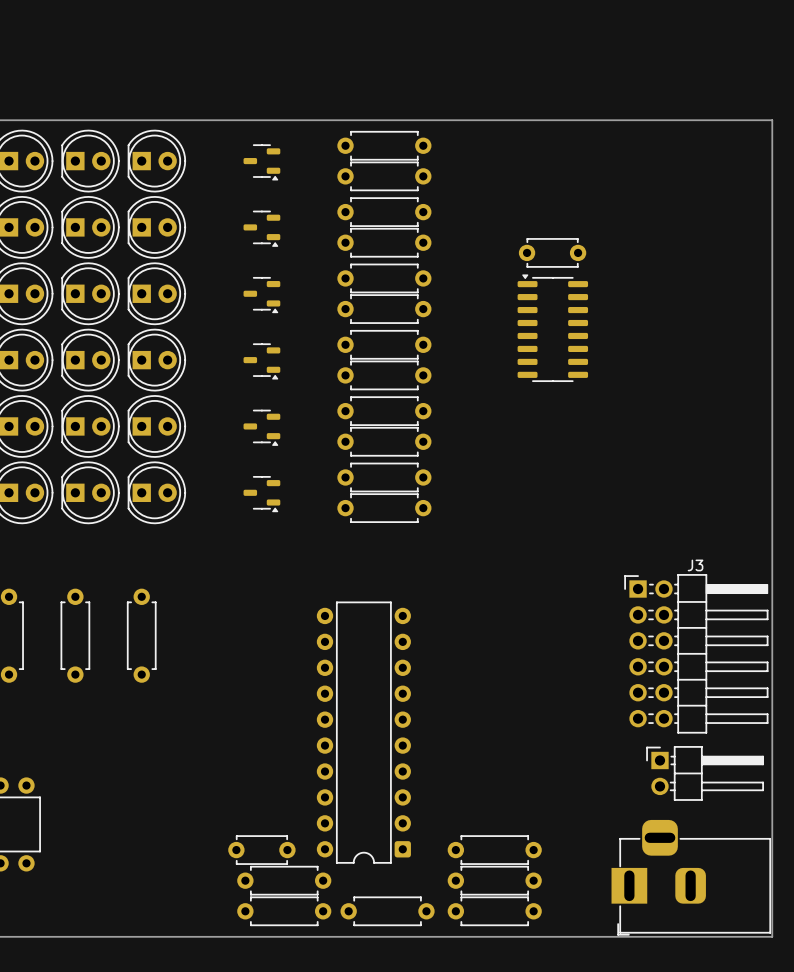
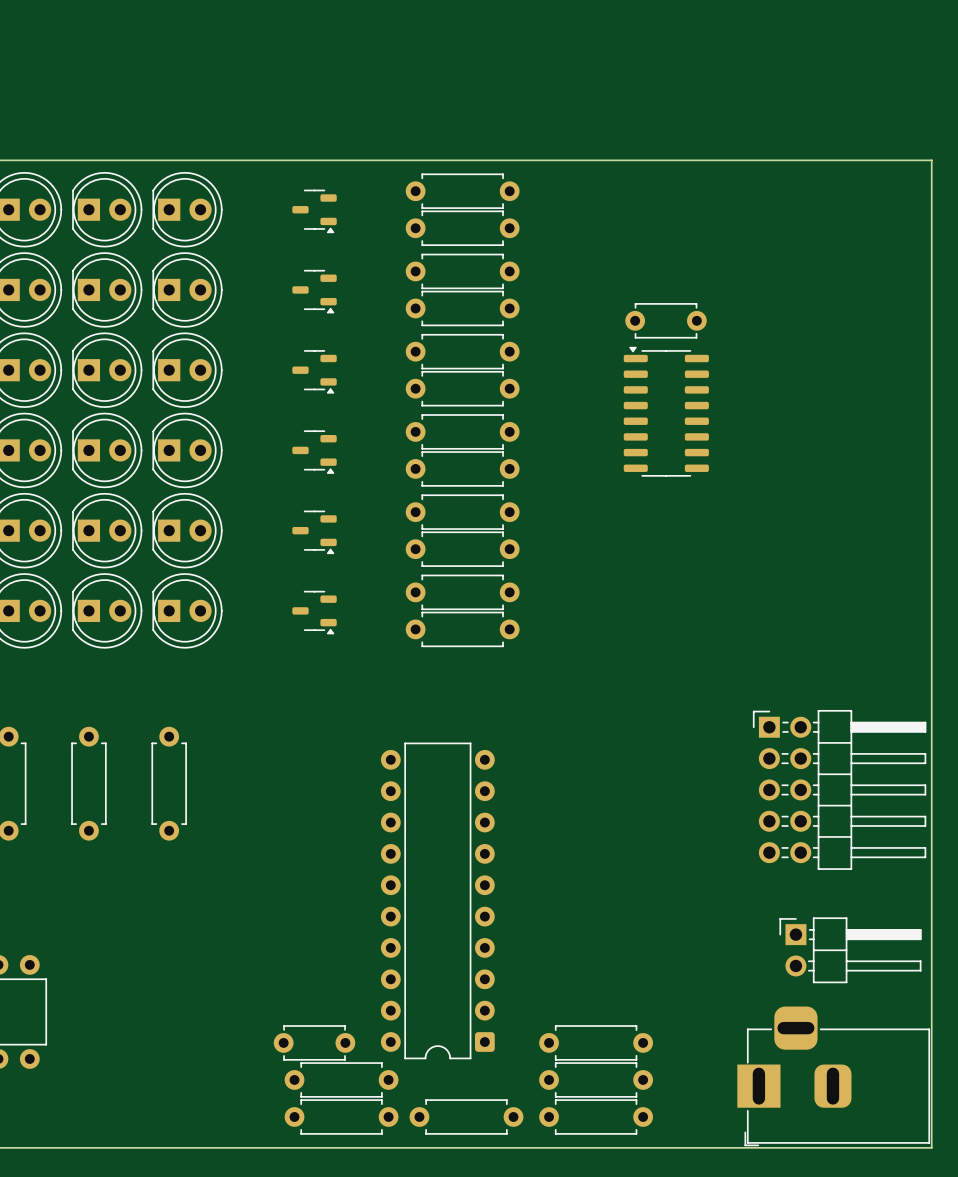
part: none -> (839, 789)
J3: (696, 653) -> none

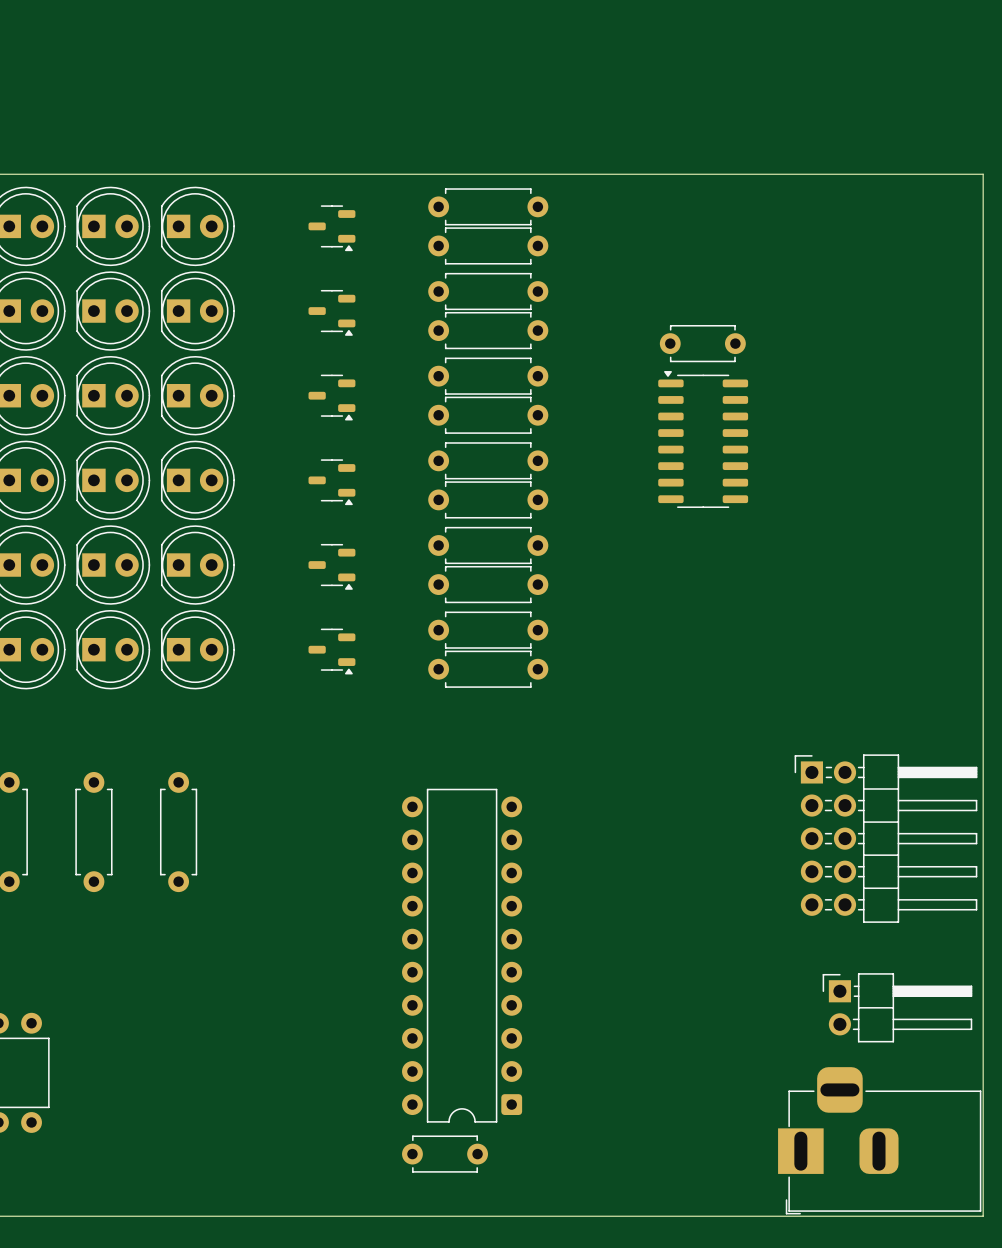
part position: (314, 1042) -> (445, 1154)
part: (596, 1042) -> none
part: (341, 1079) -> none
part: (596, 1079) -> none
part: (341, 1116) -> none
part: (466, 1116) -> none
part: (596, 1116) -> none

